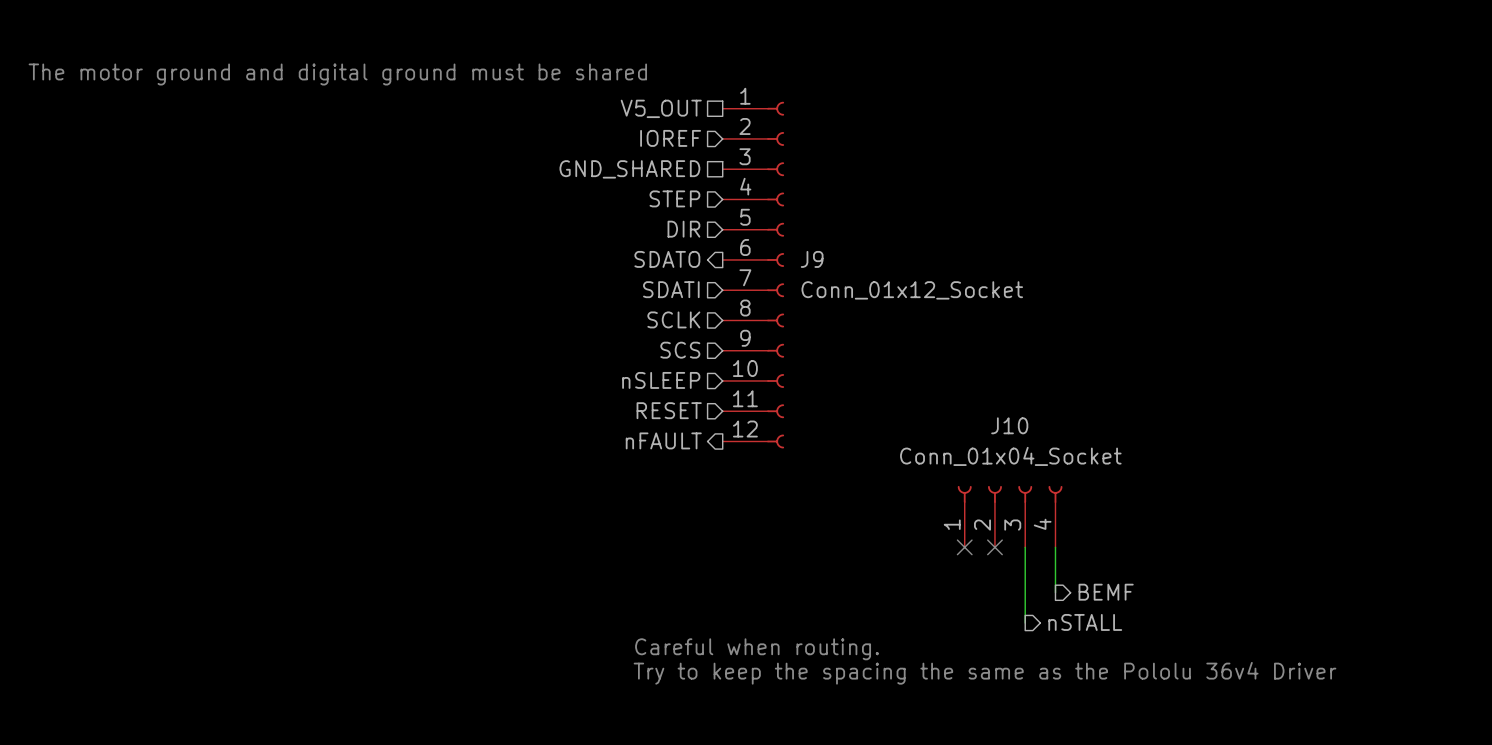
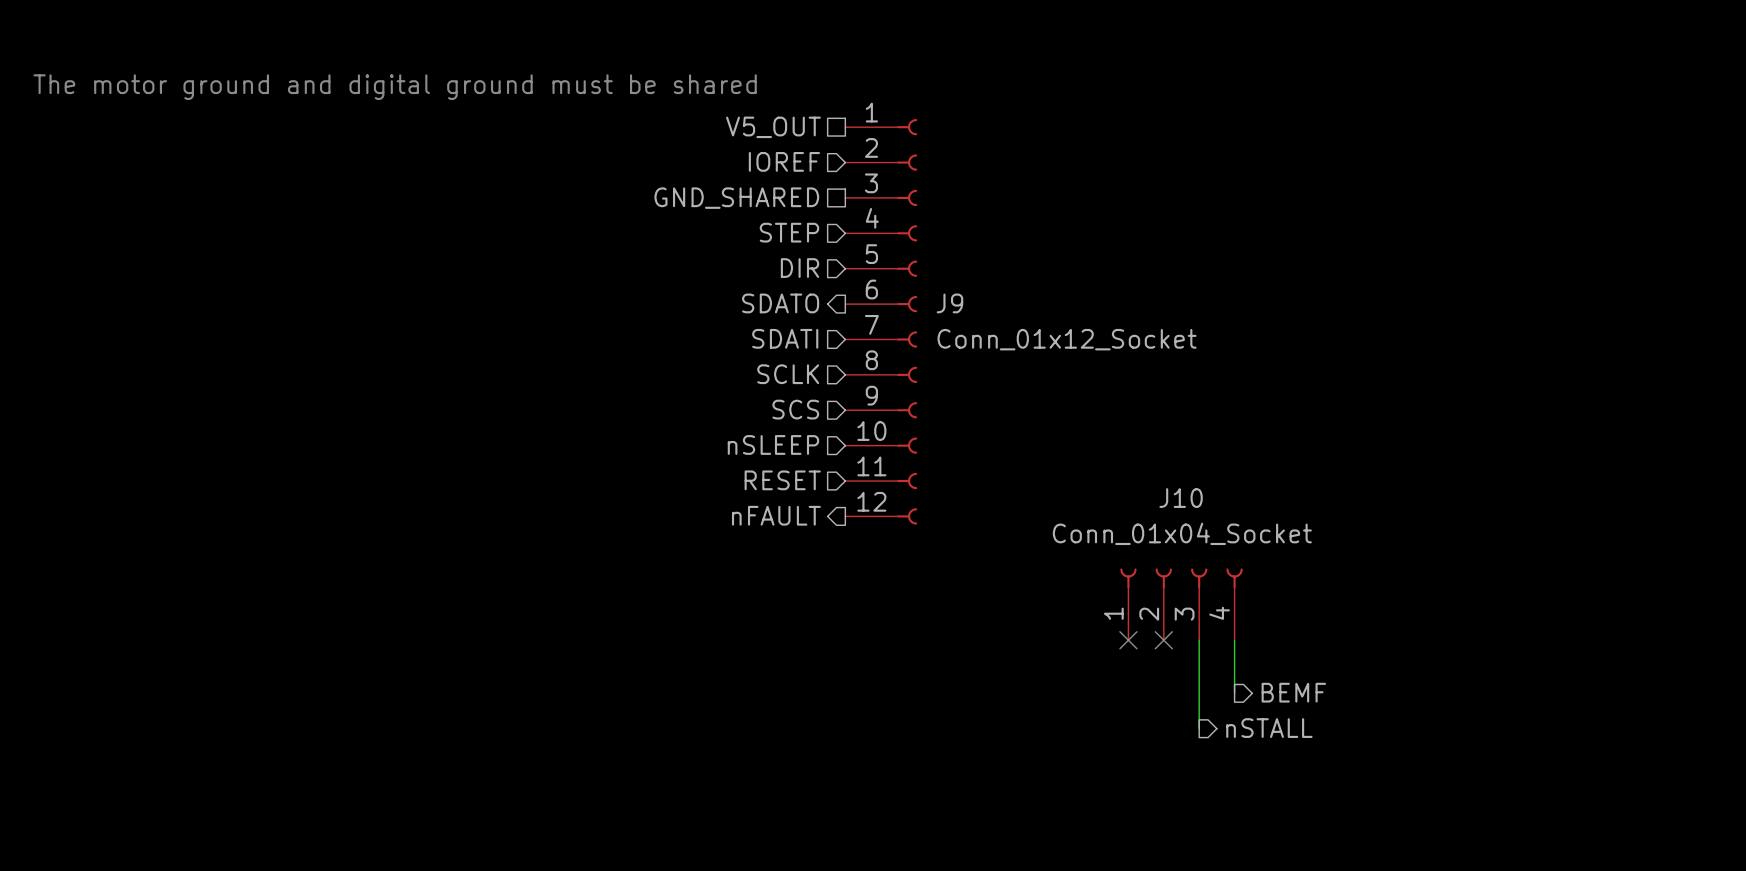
text: Careful when routing. (757, 649) -> none
text: Try to keep the spacing the same as the Pololu 36v4 Driver (985, 673) -> none

